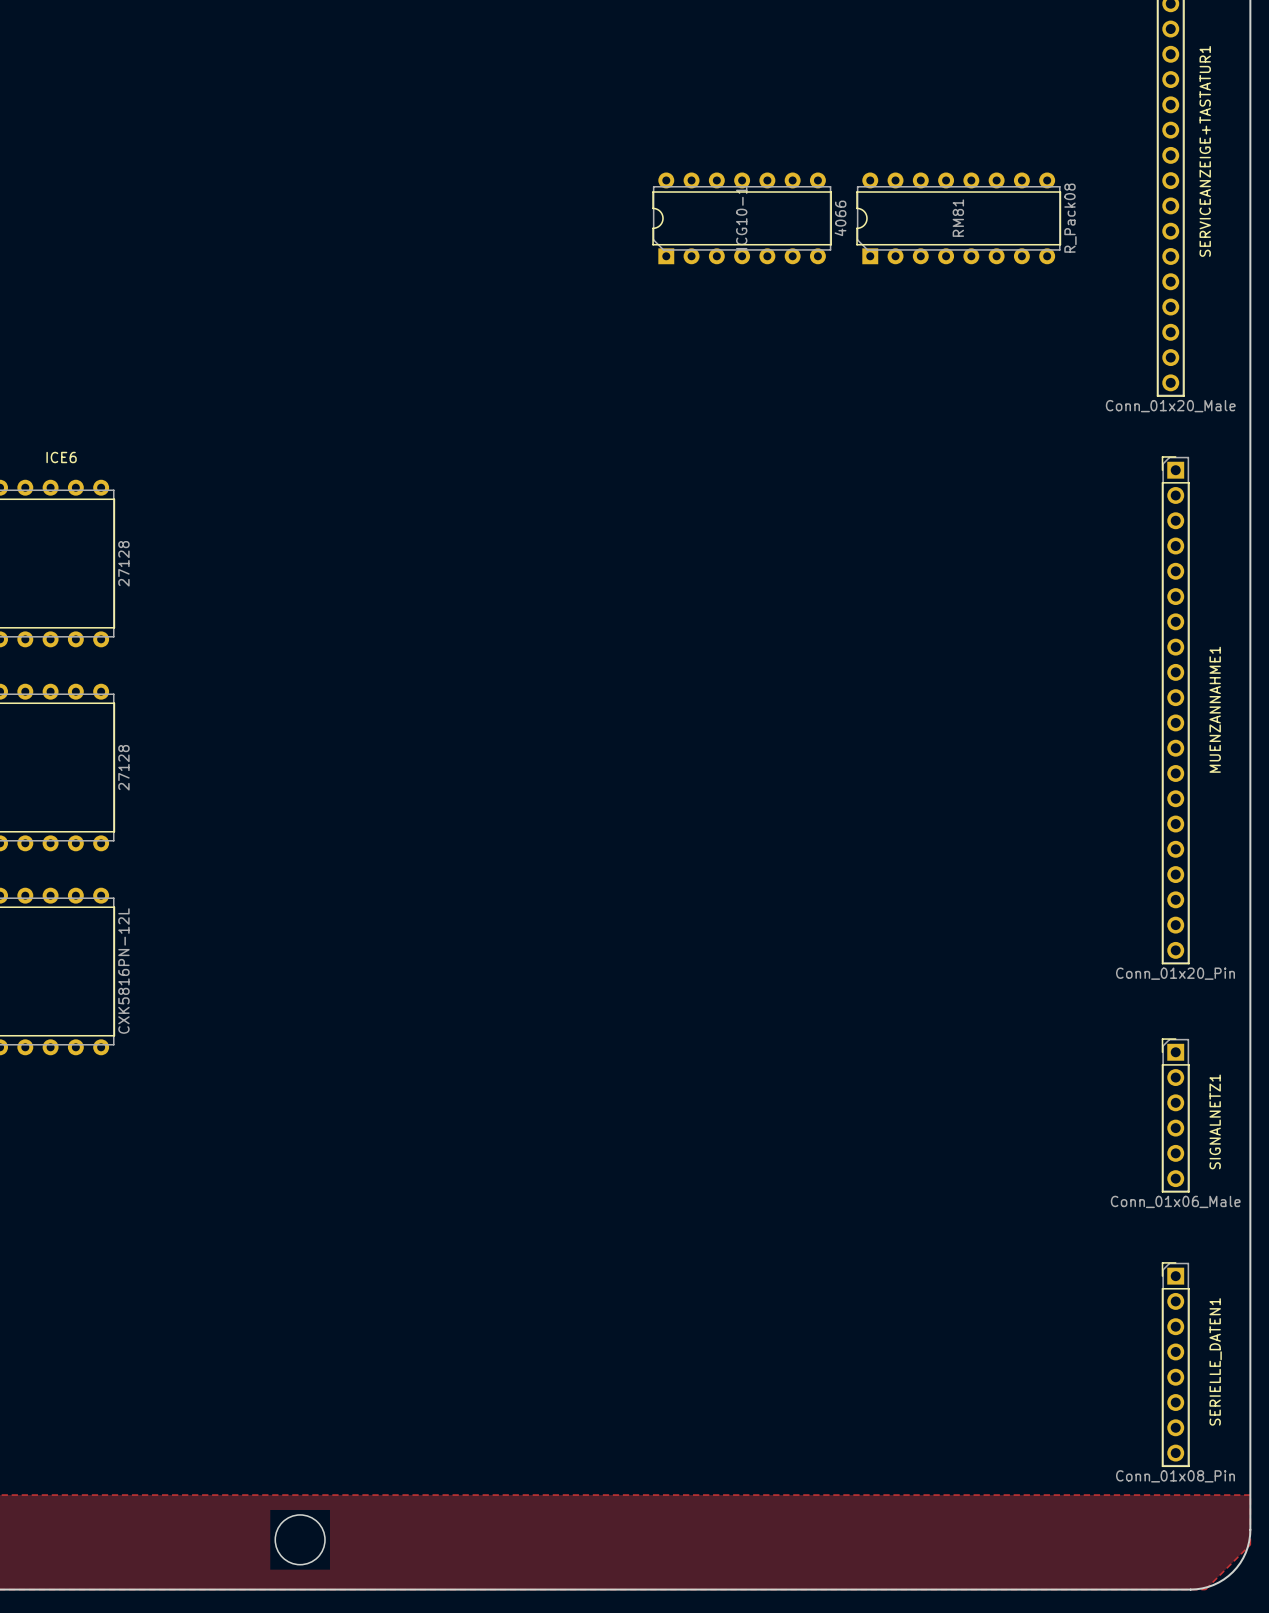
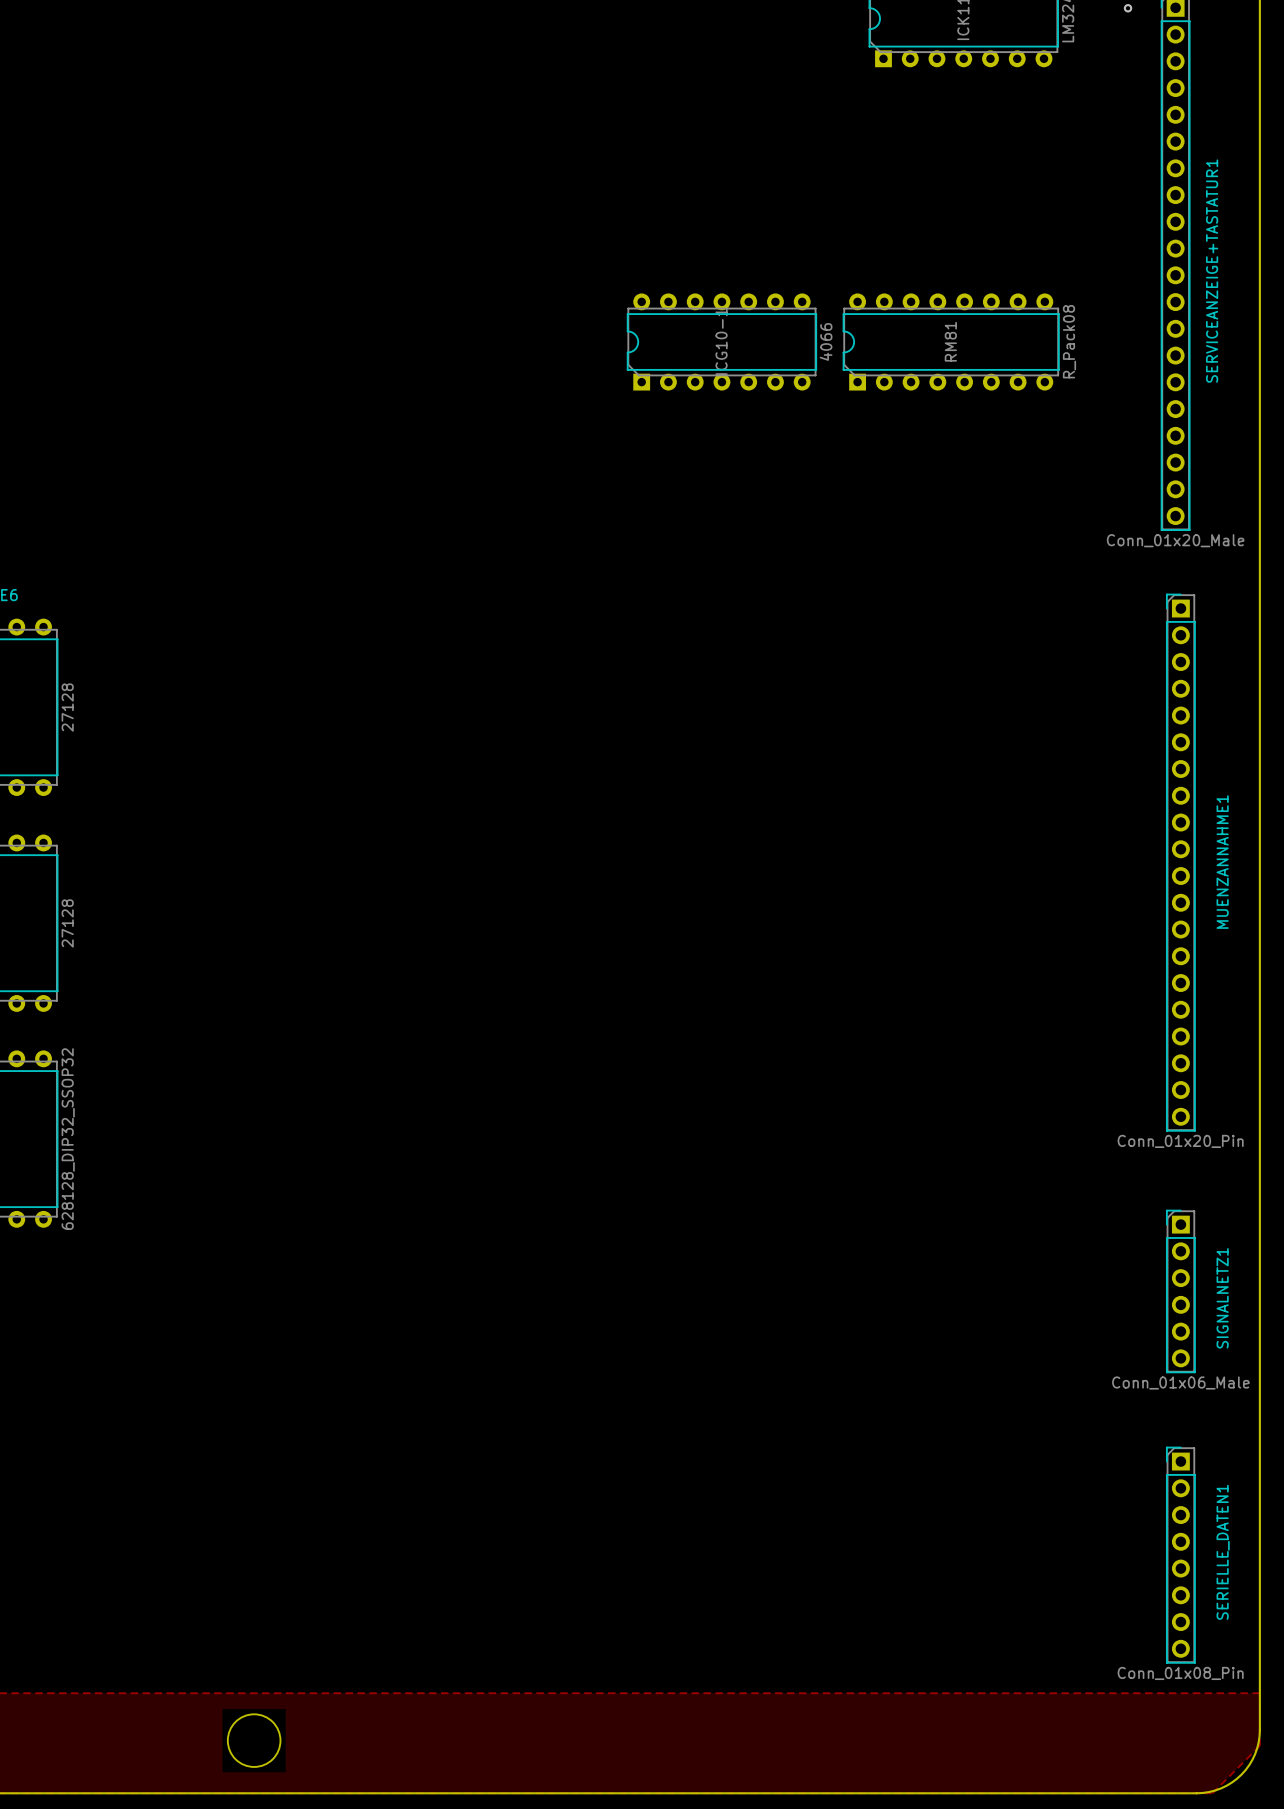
part value: CXK5816PN-12L (123, 971) -> 628128_DIP32_SSOP32 (68, 1139)

